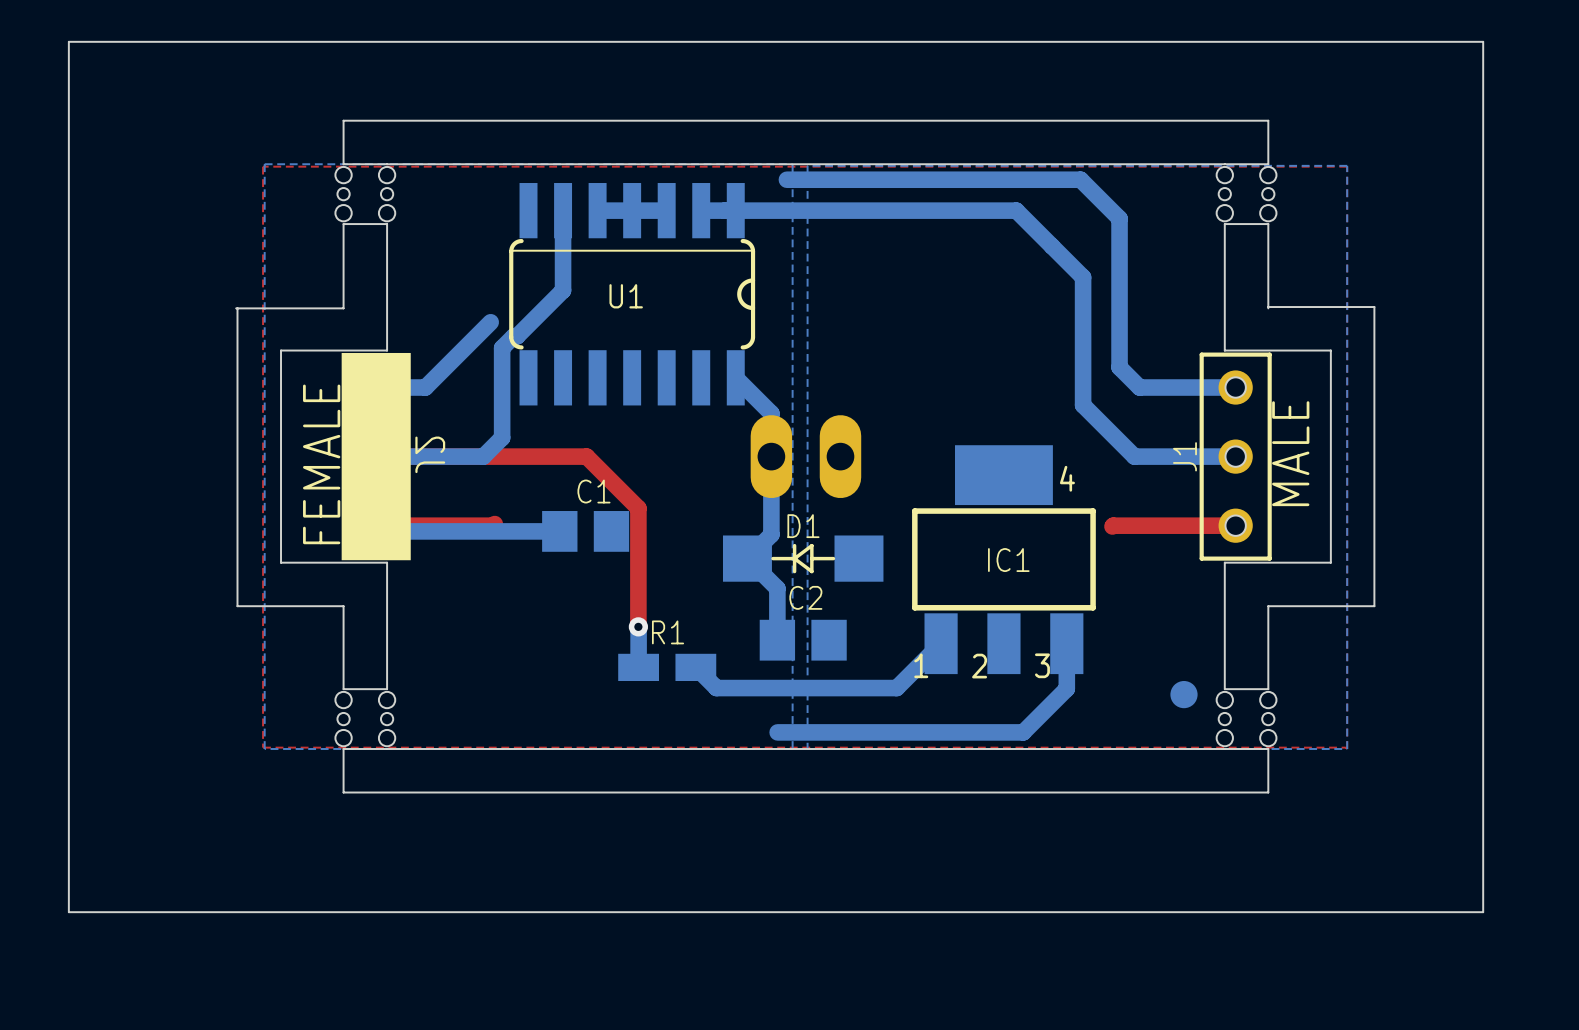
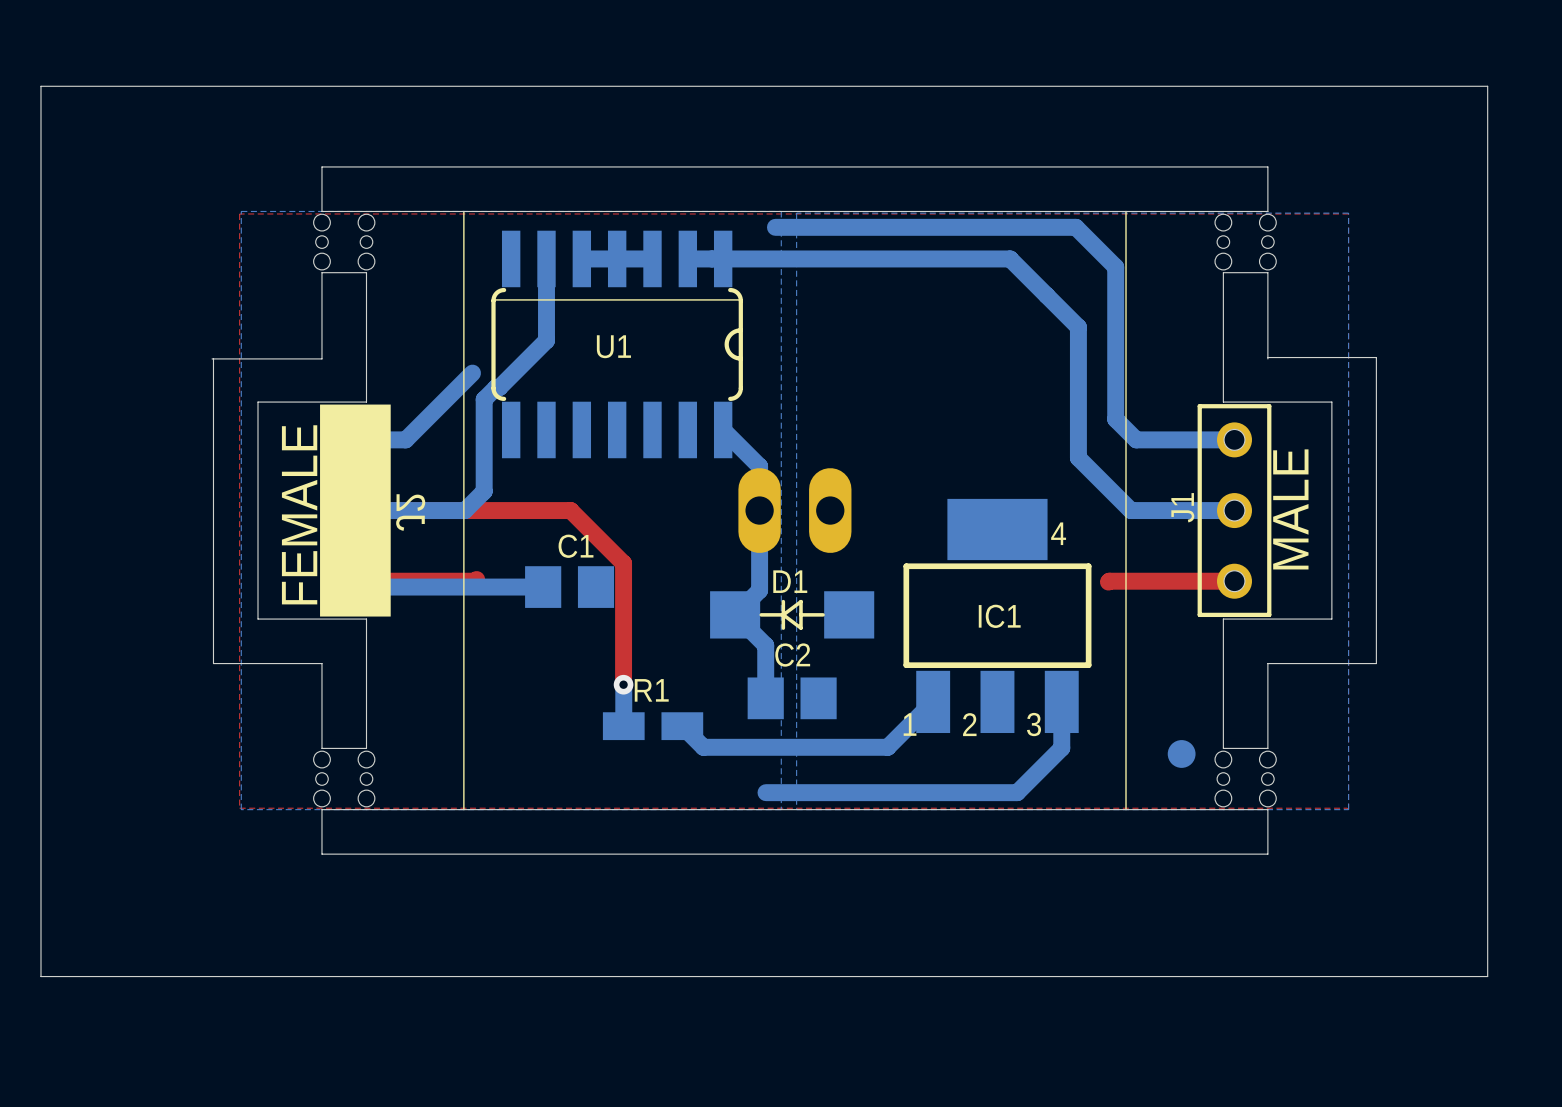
line: none -> (463, 211) (463, 809)
line: none -> (1126, 211) (1126, 809)

